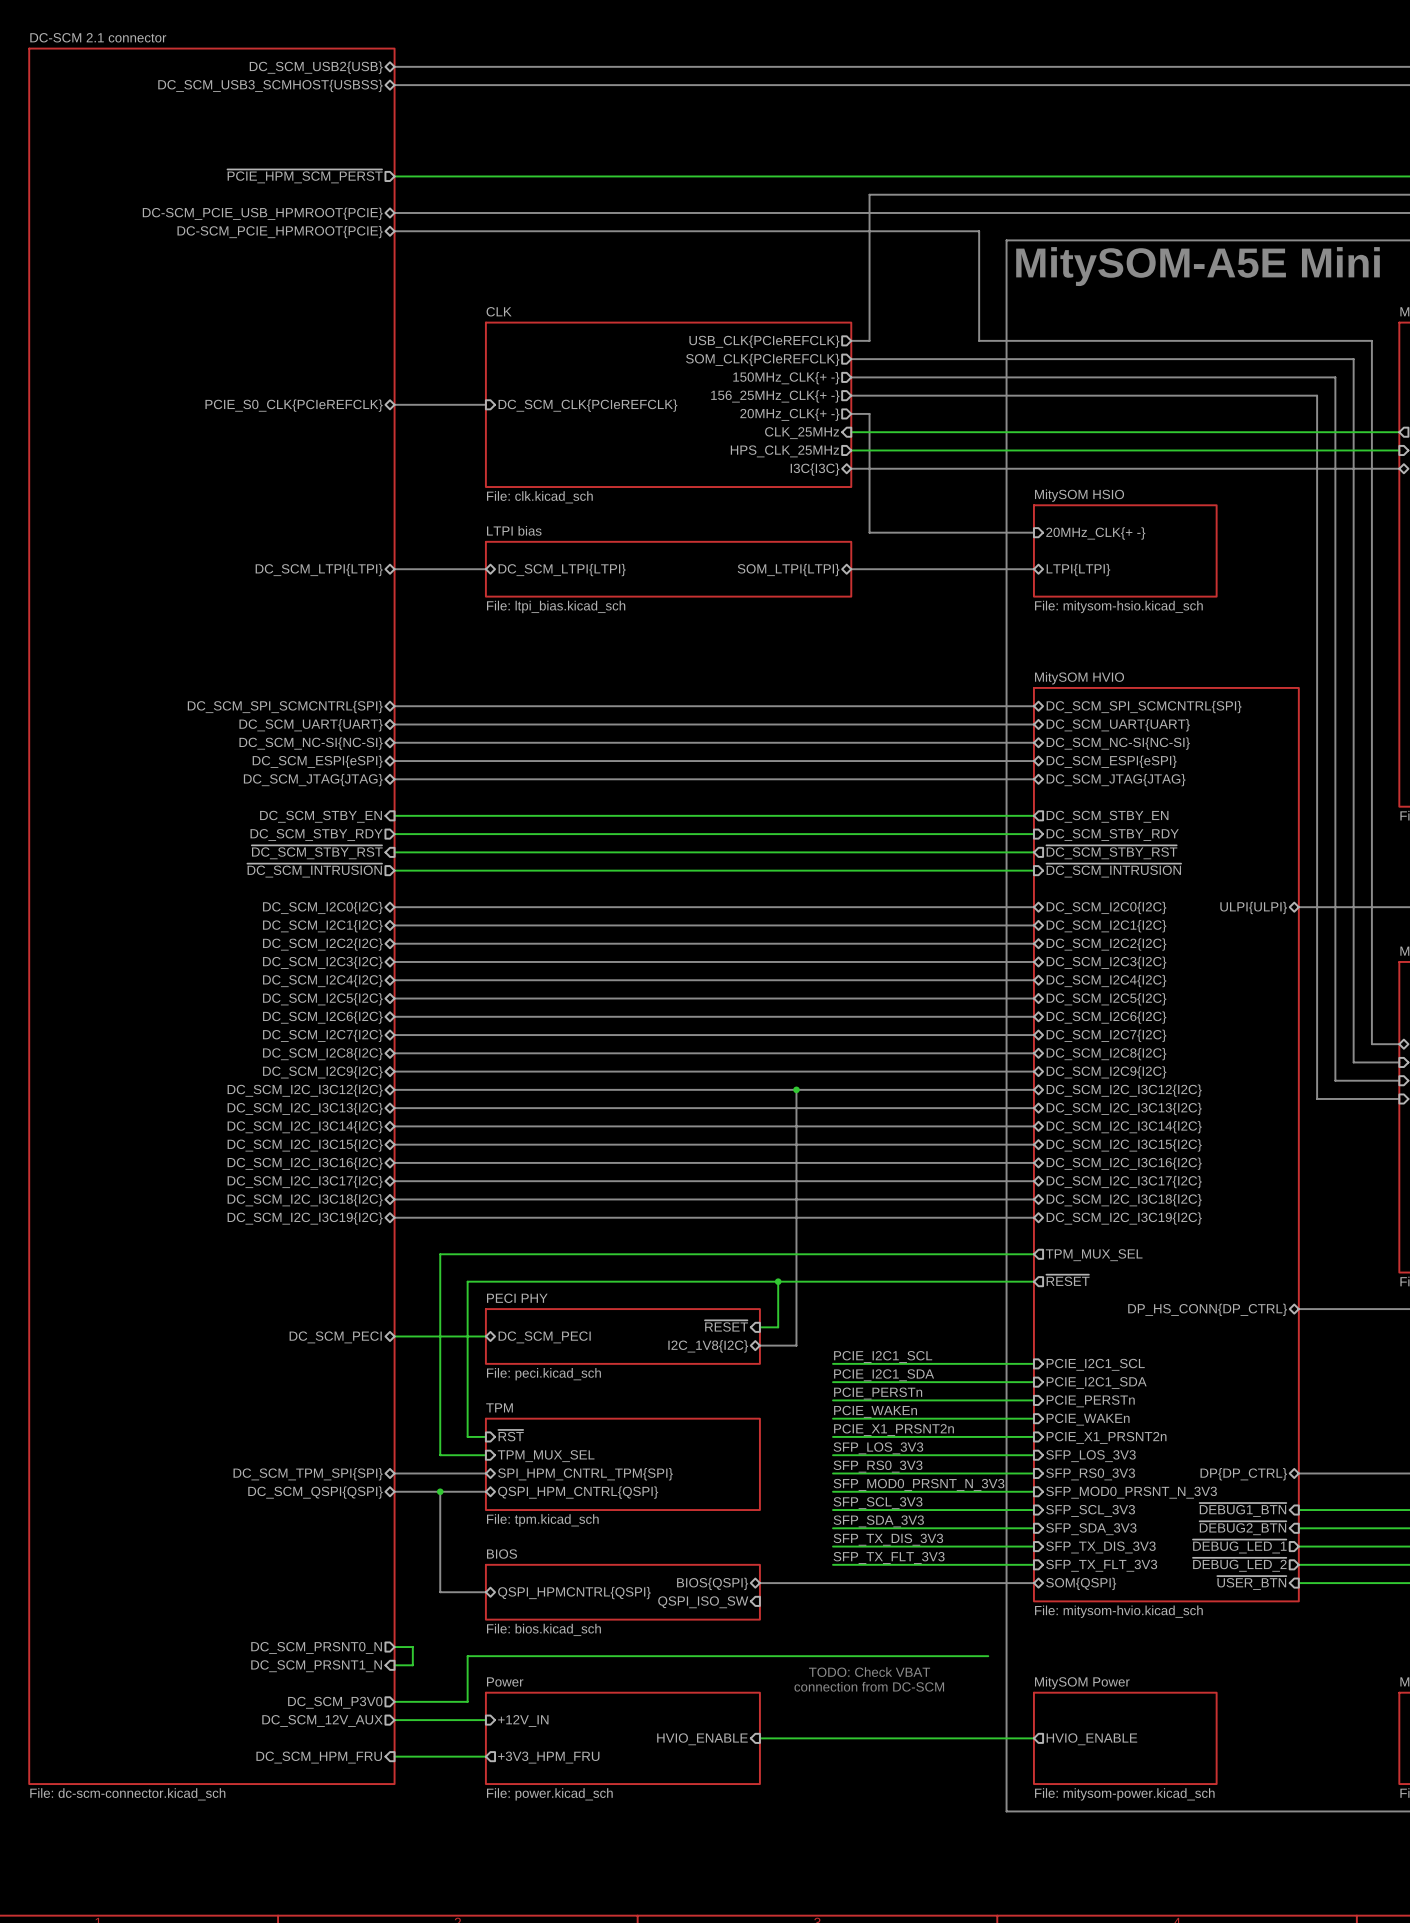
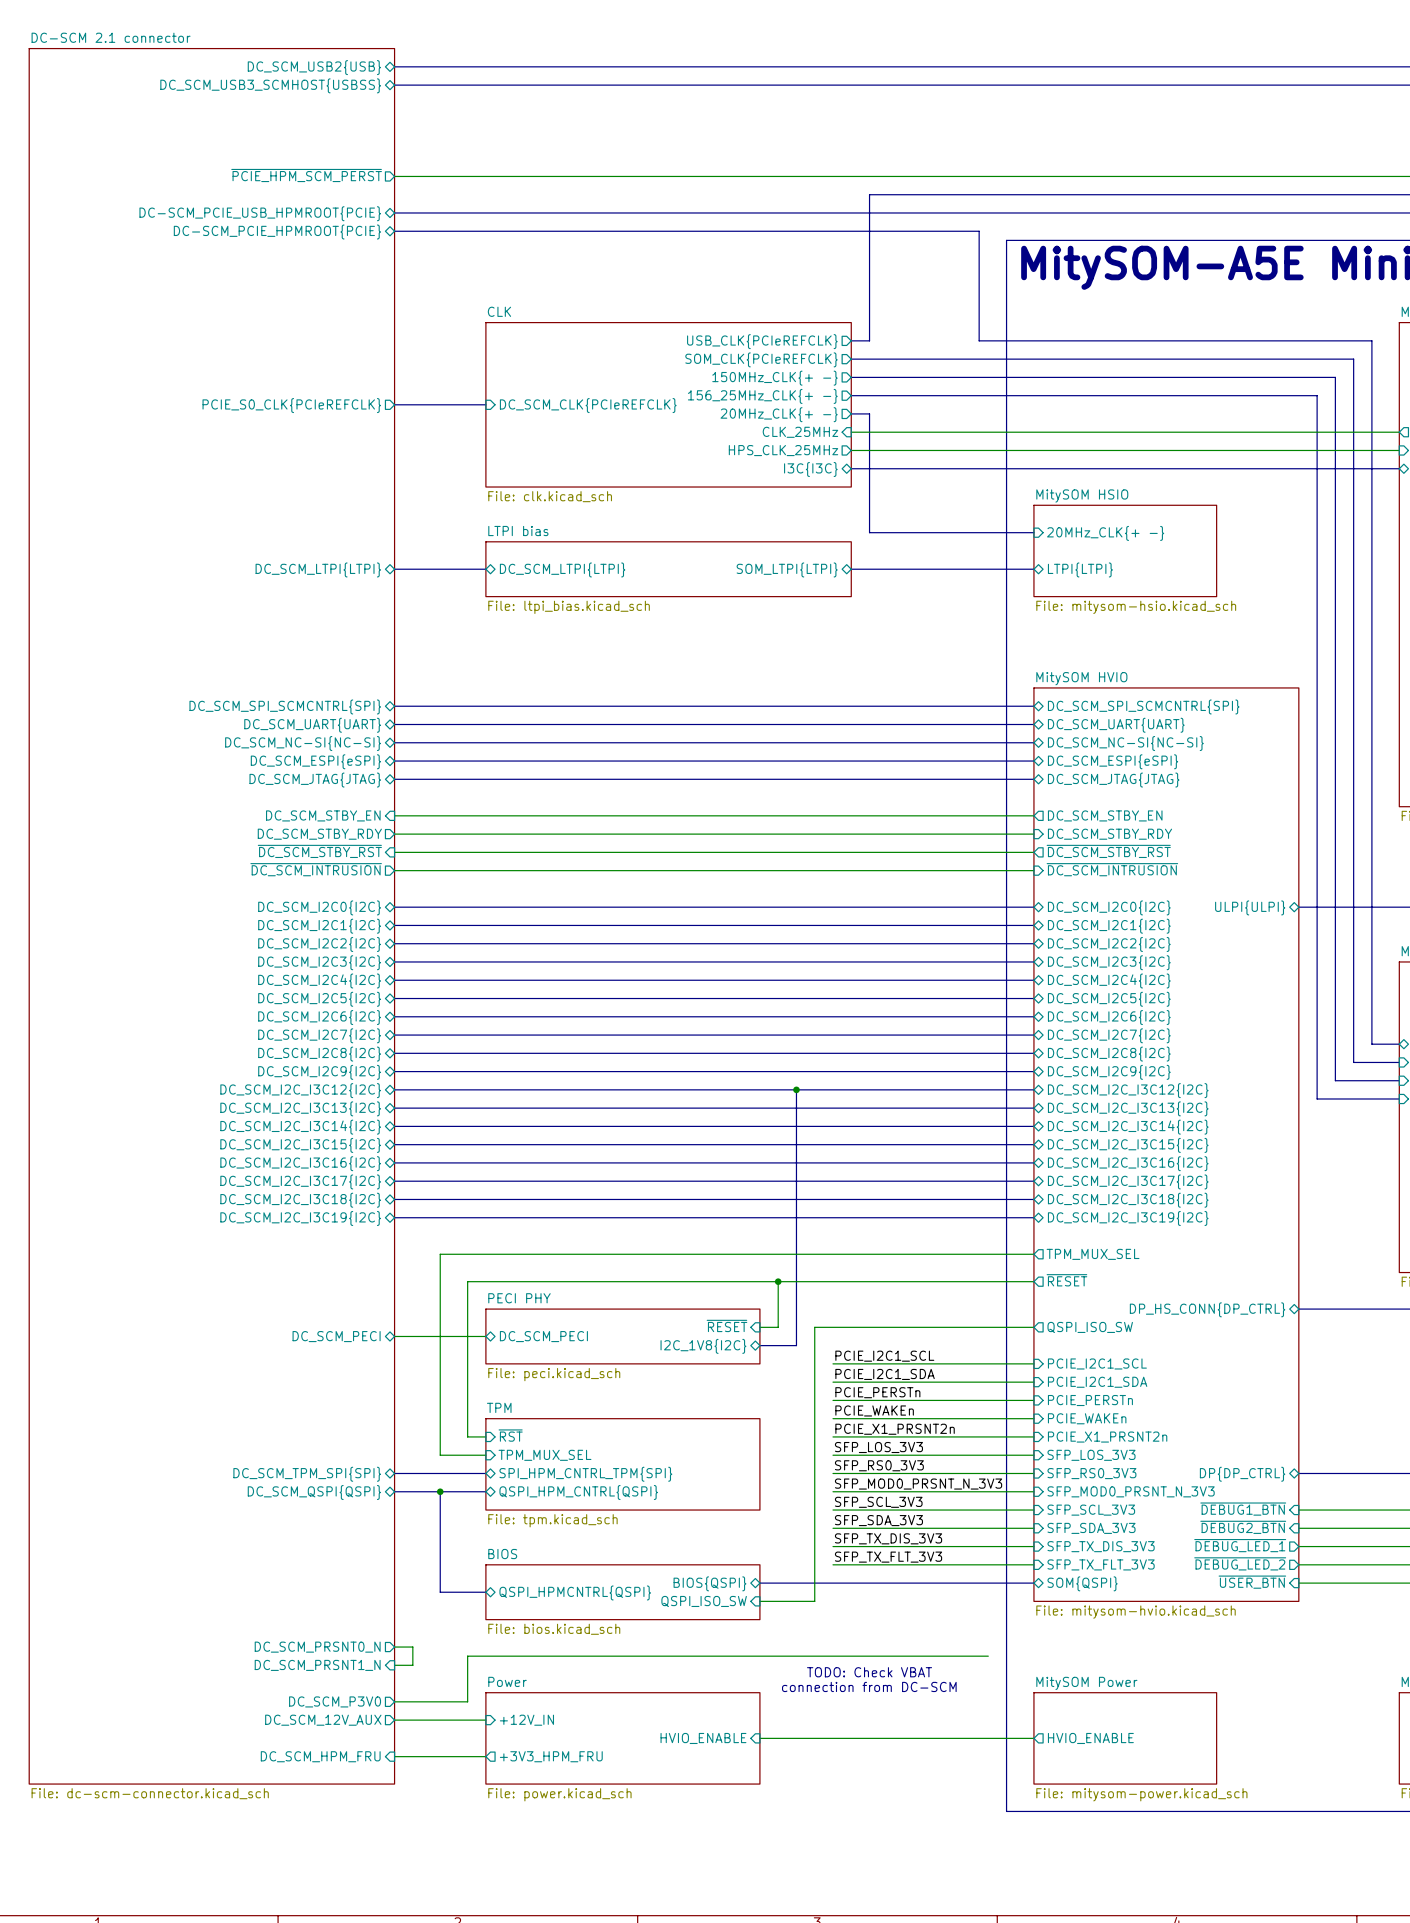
sheet pin shape: bidirectional (294, 405) -> output (291, 405)
wire: none -> (1033, 1327) (814, 1327) (814, 1601) (759, 1601)
sheet pin: none -> QSPI_ISO_SW (1090, 1327)

